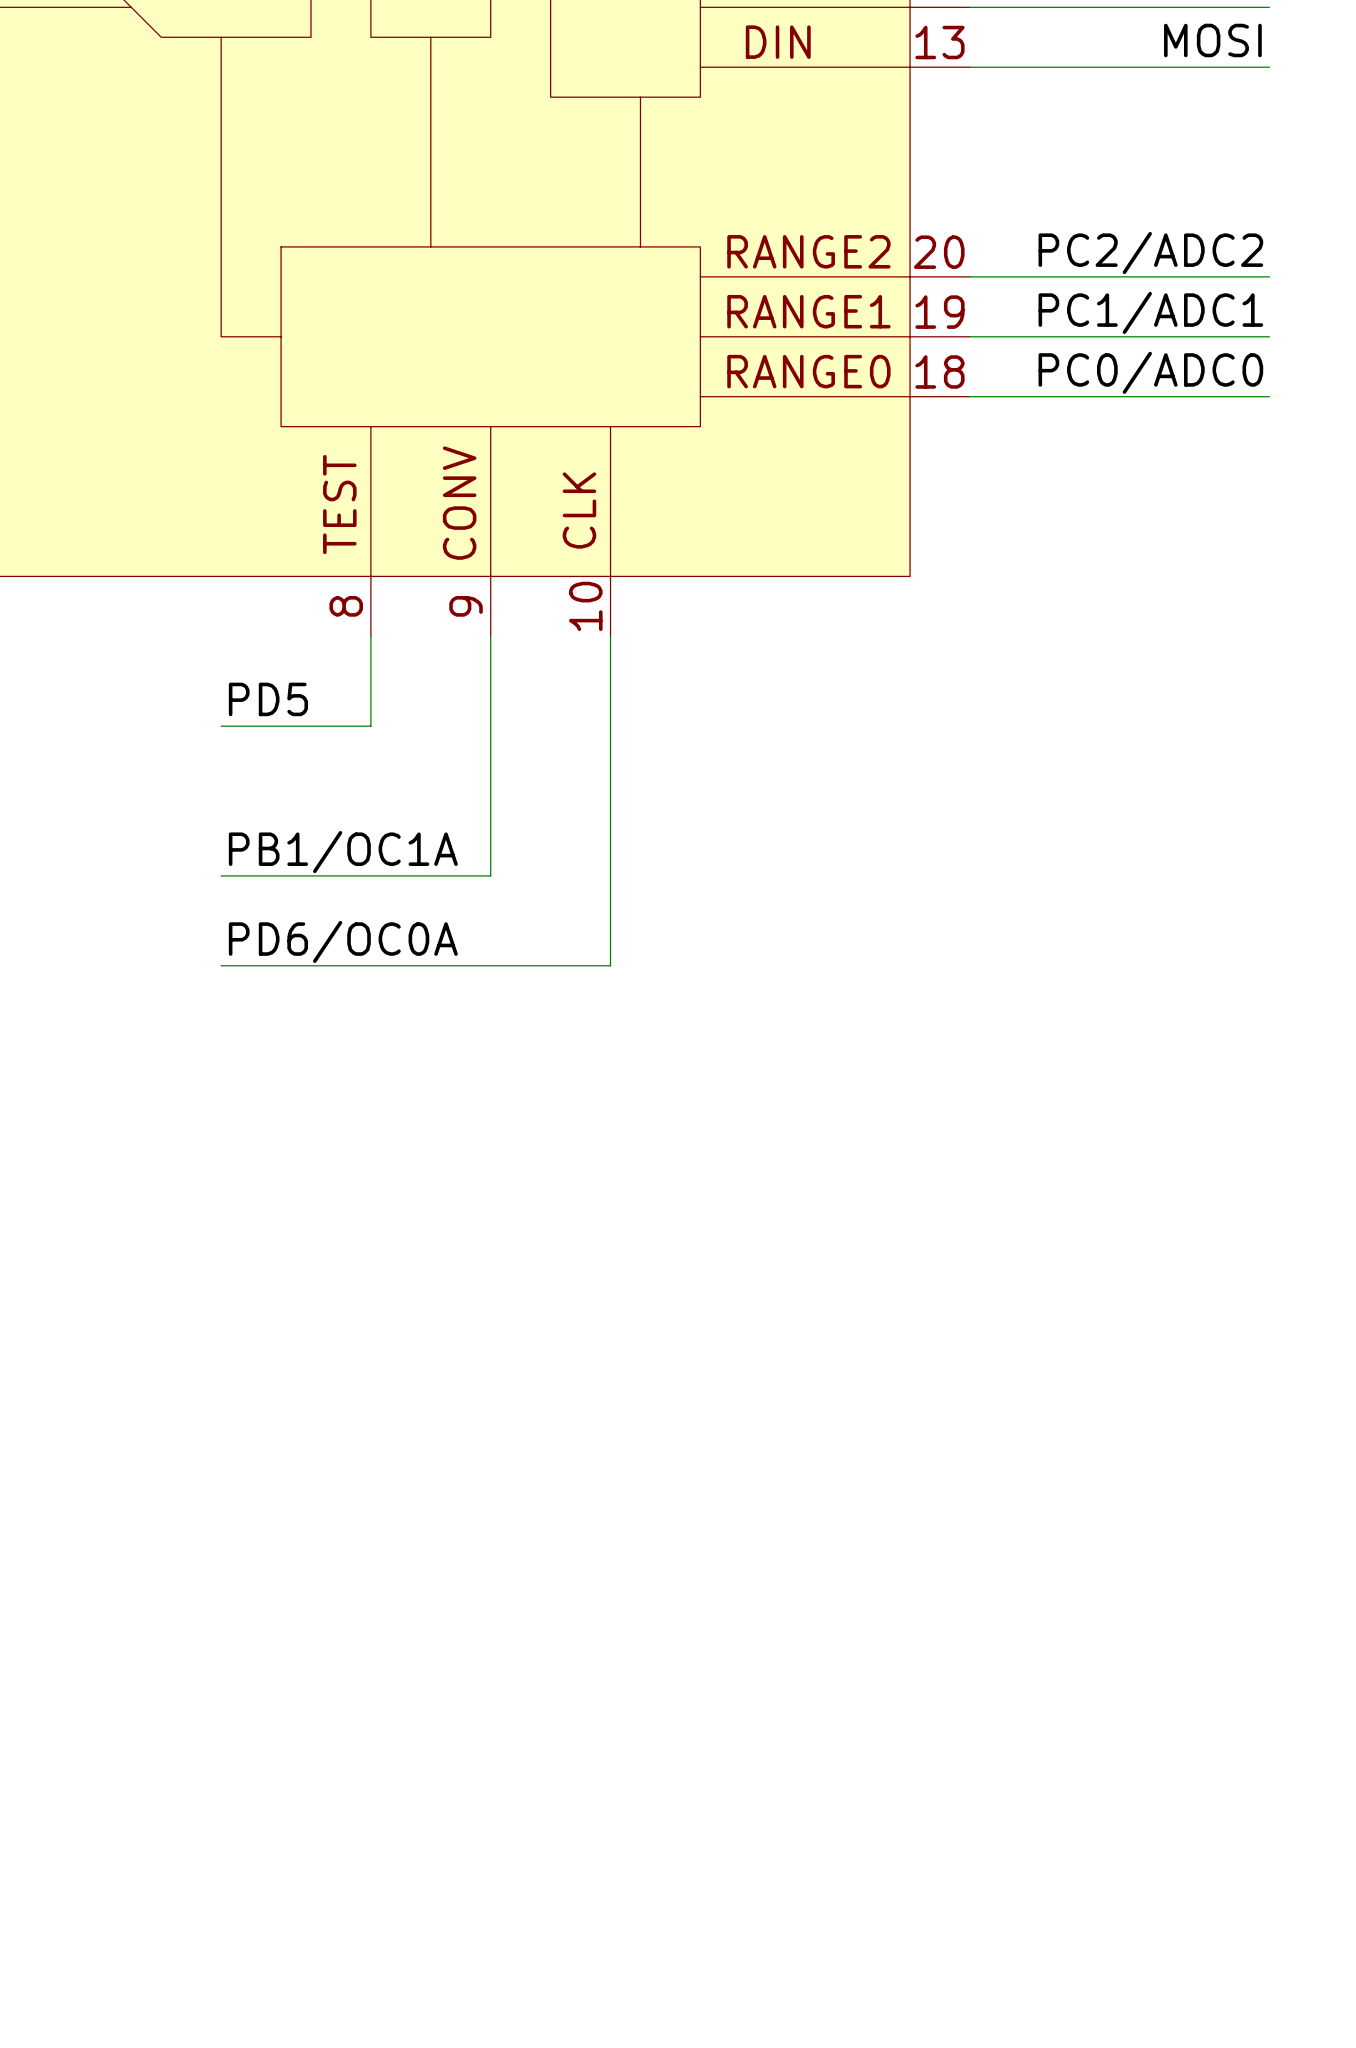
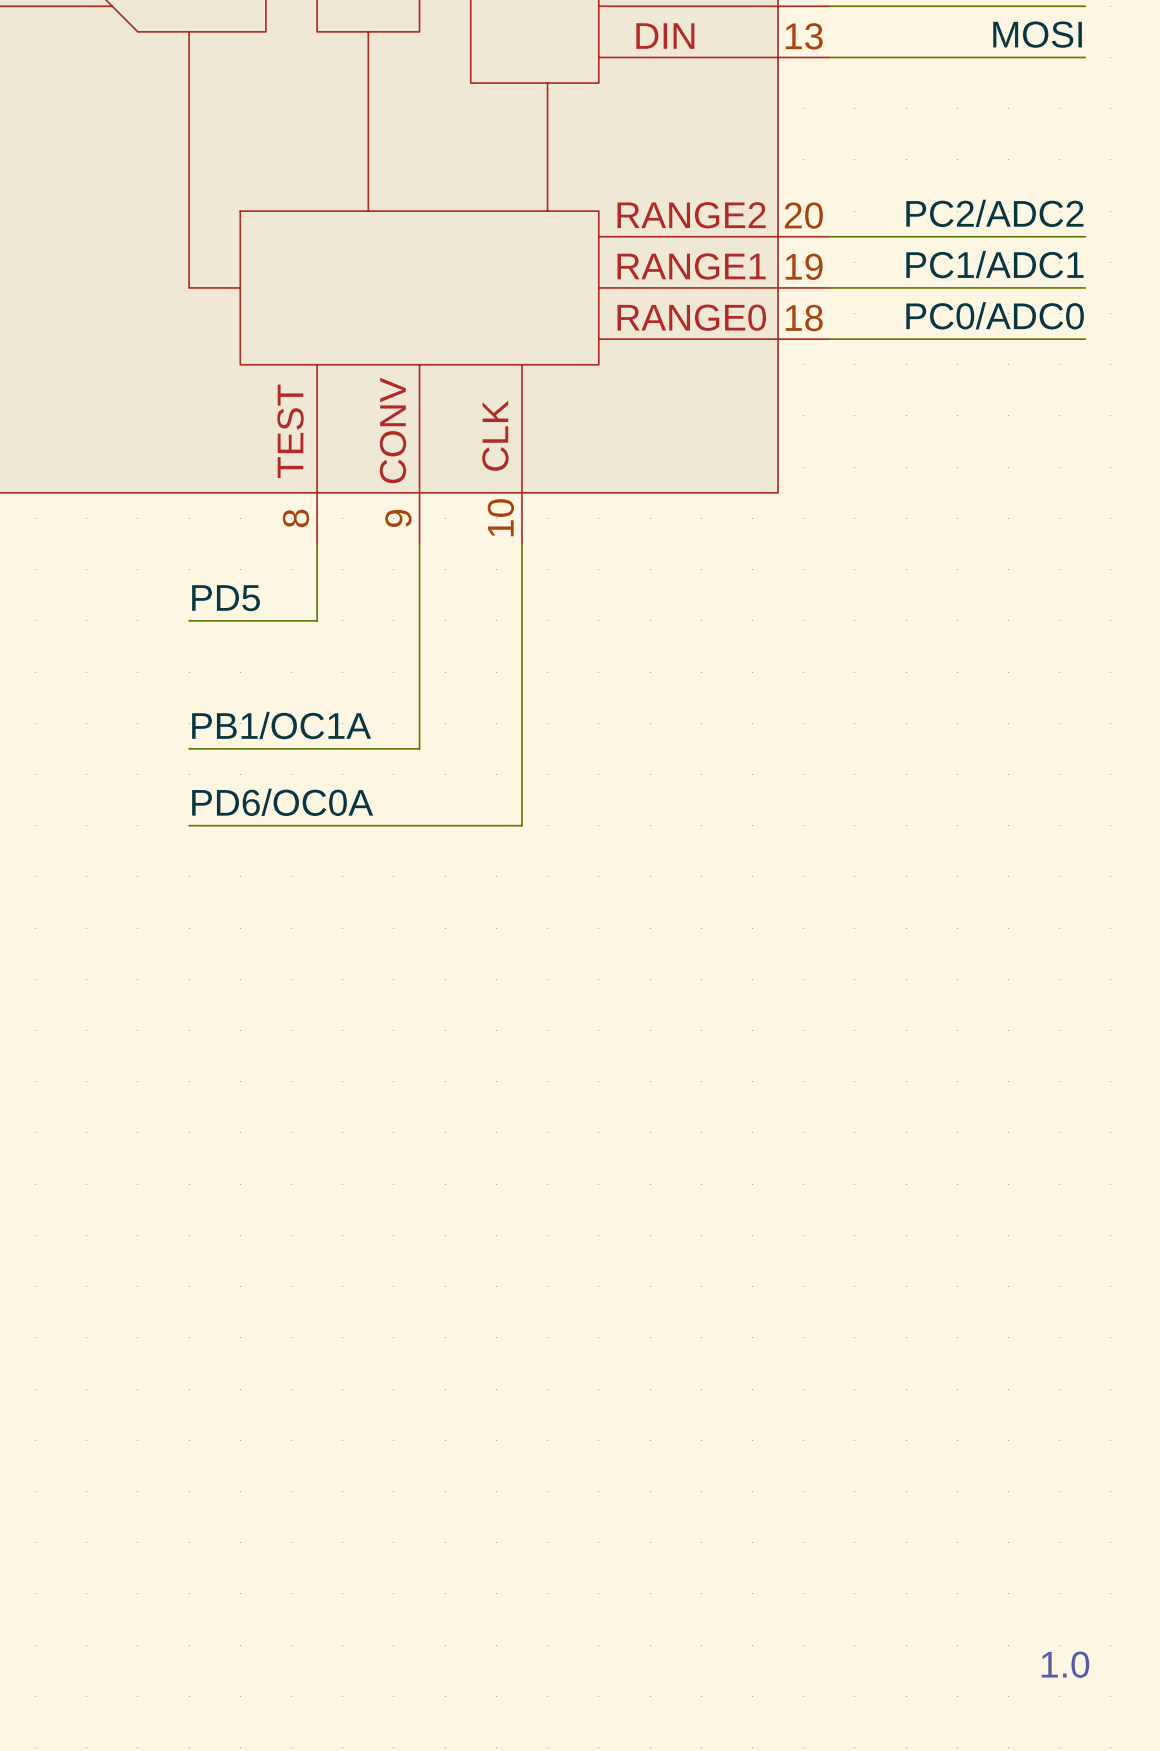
text: none -> 1.0 (1065, 1664)

